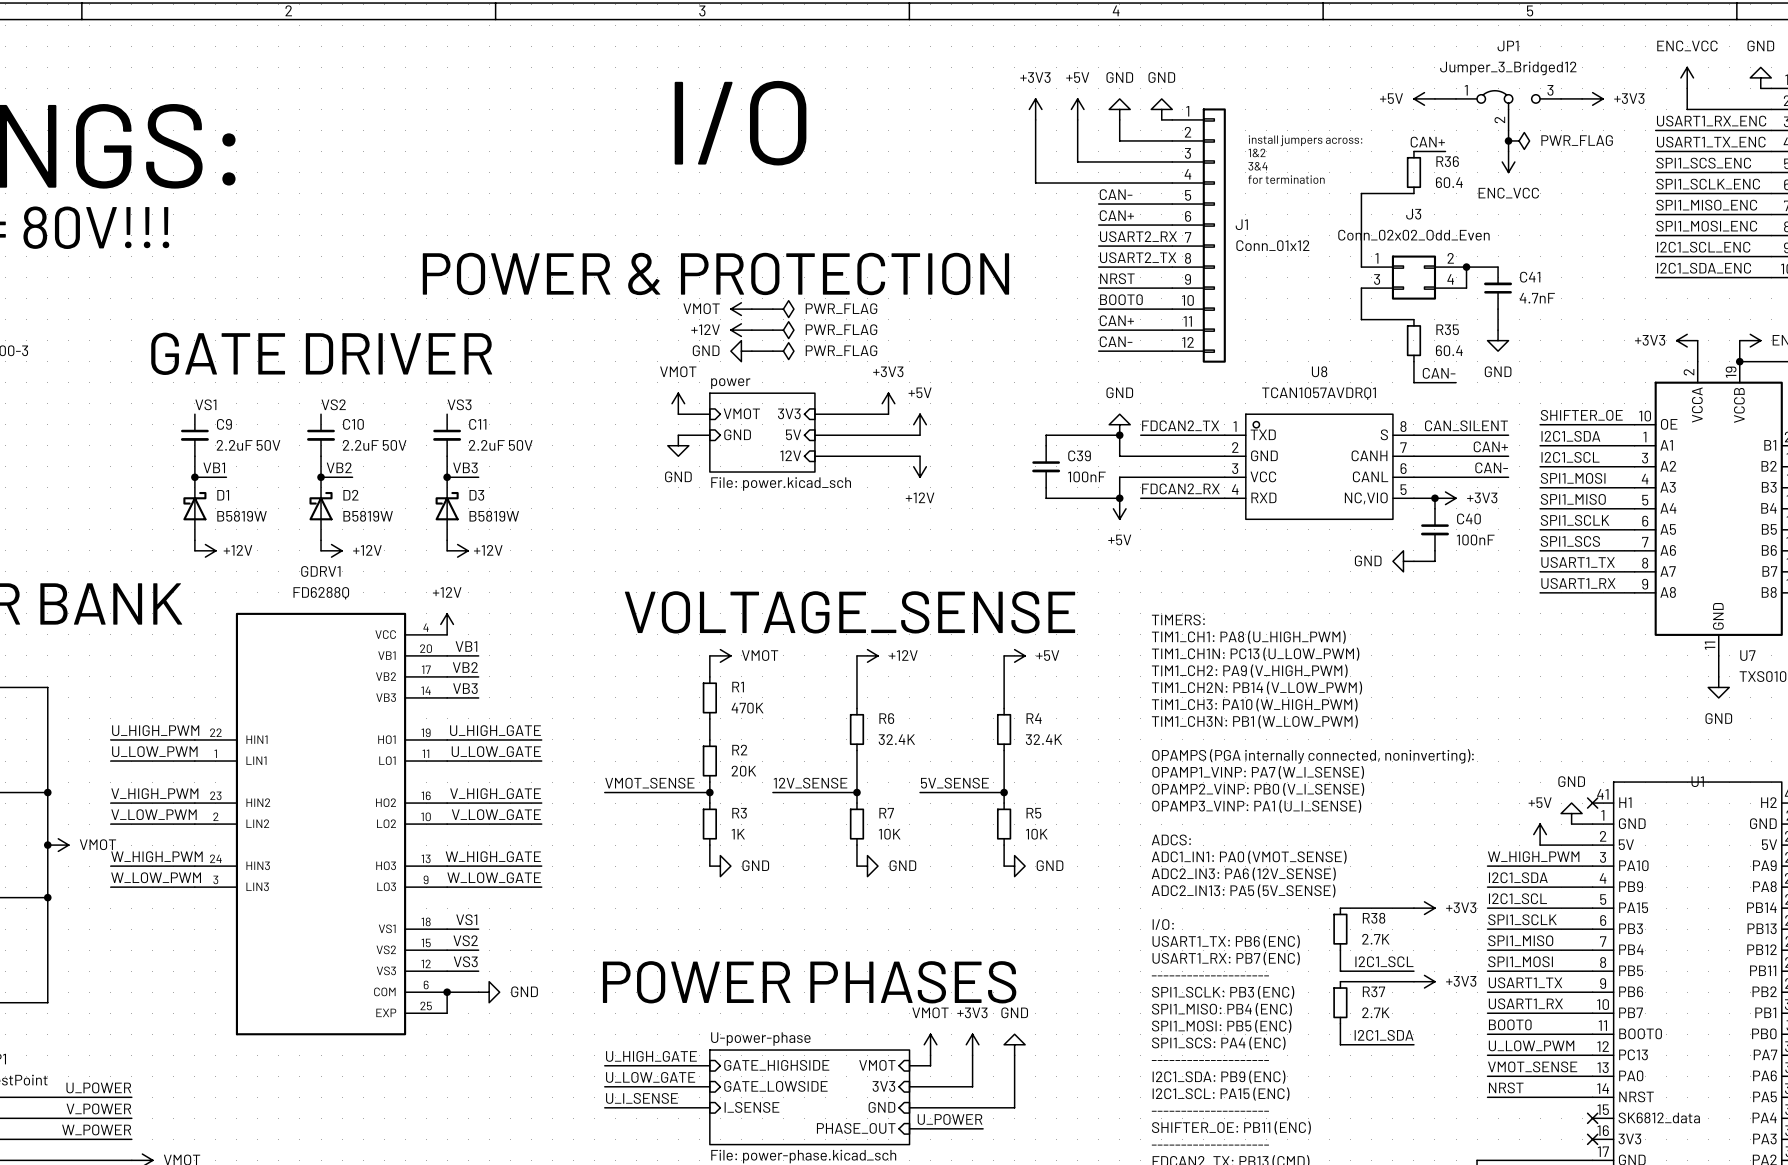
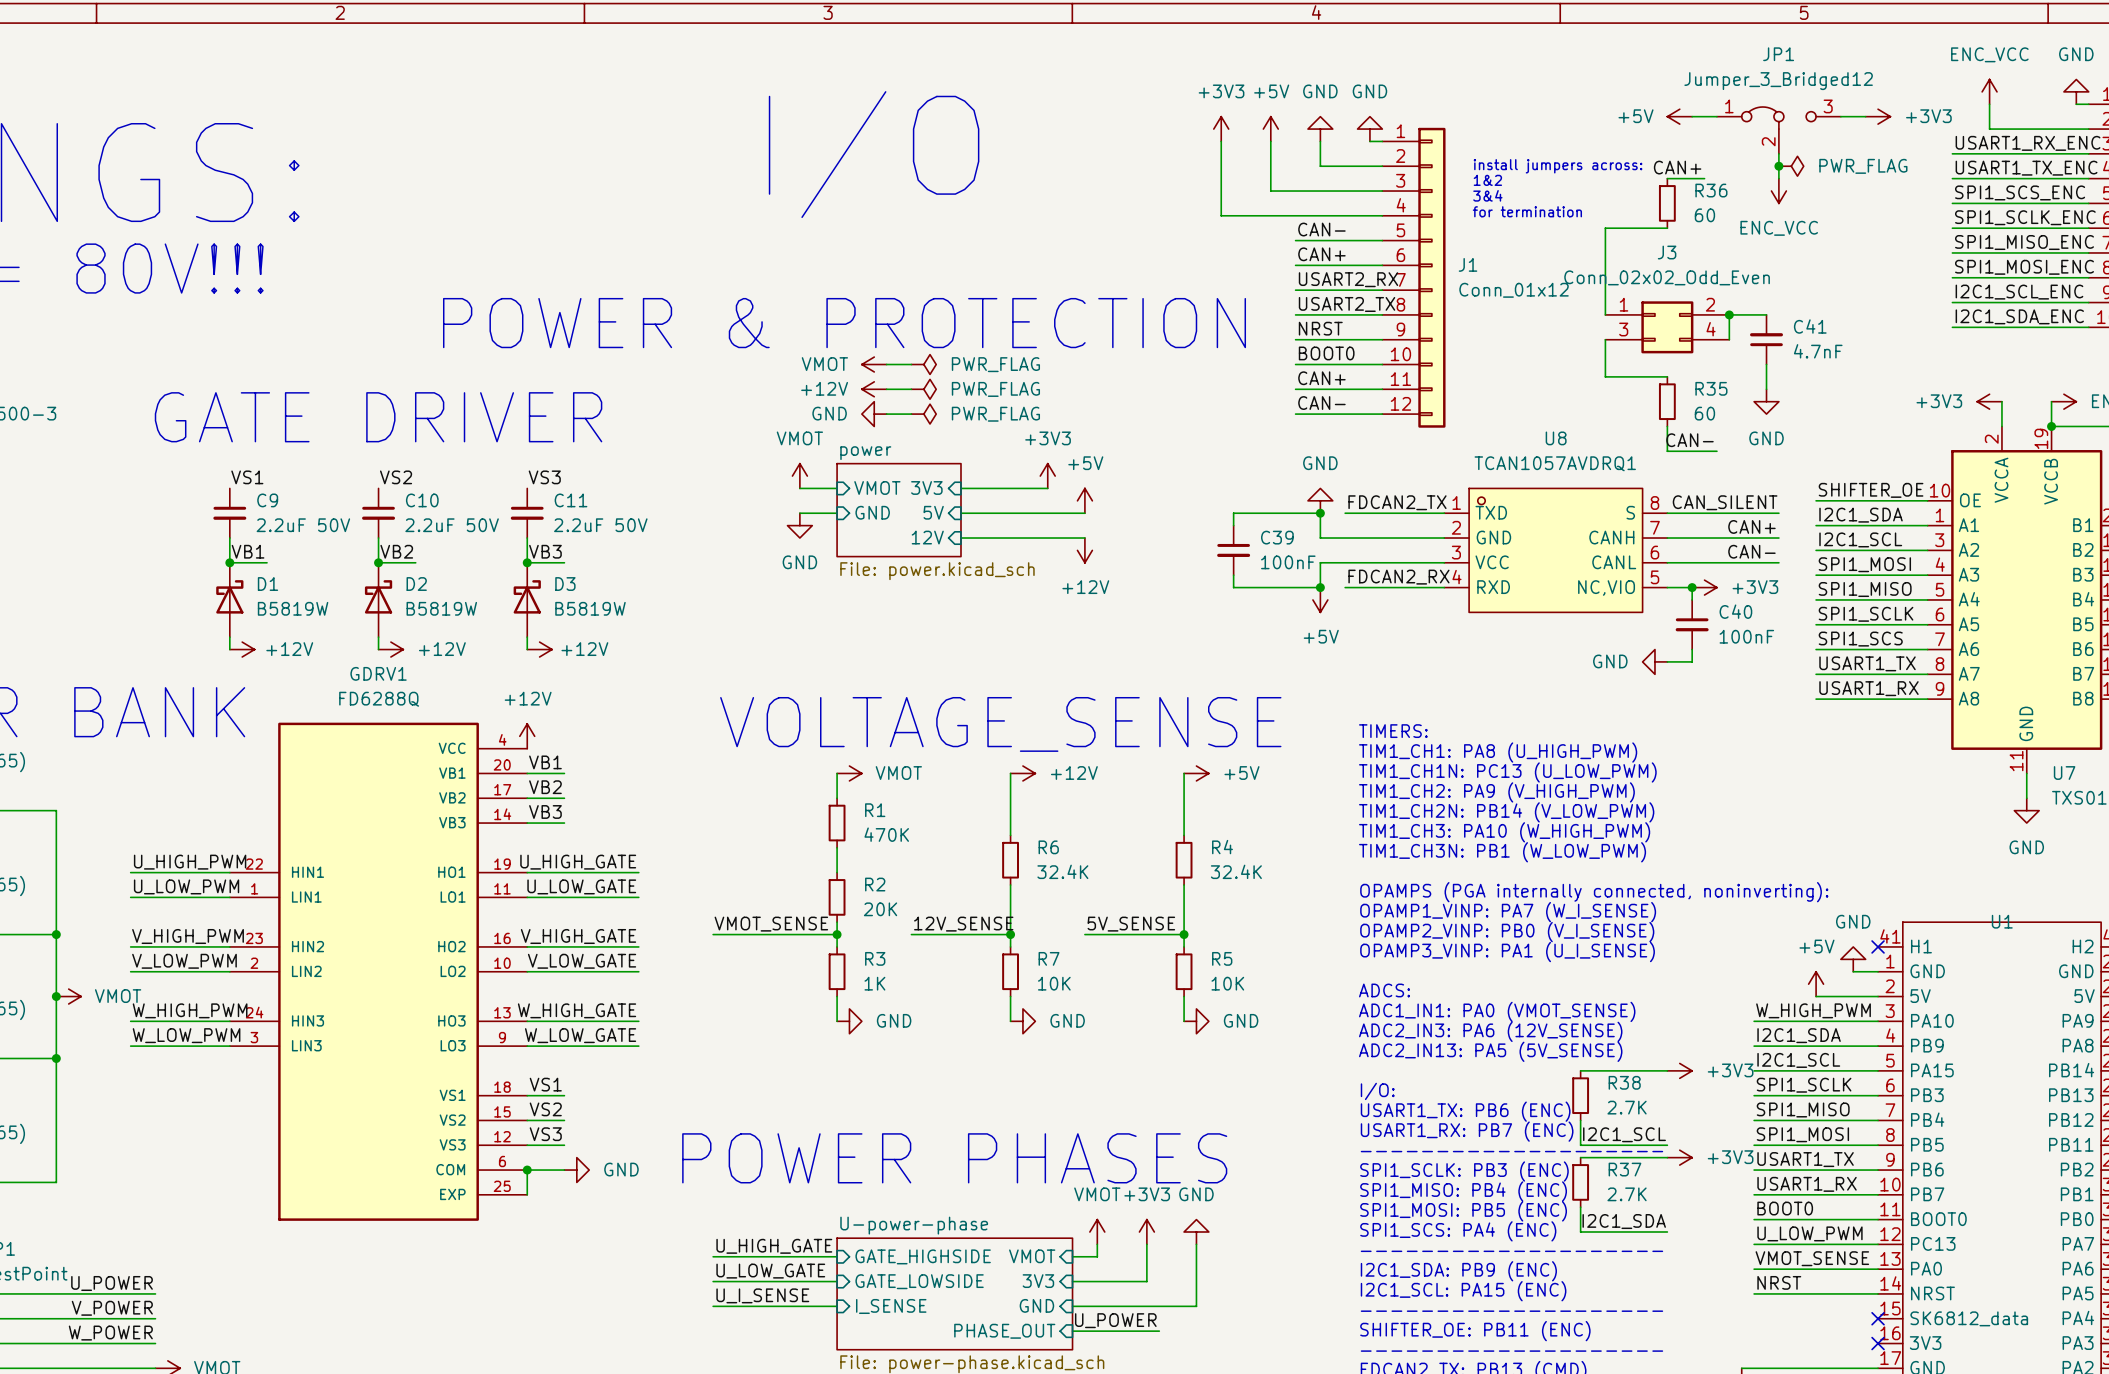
R36 value: 60.4 (1449, 182) -> 60 (1704, 215)
R35 value: 60.4 (1449, 350) -> 60 (1704, 413)

